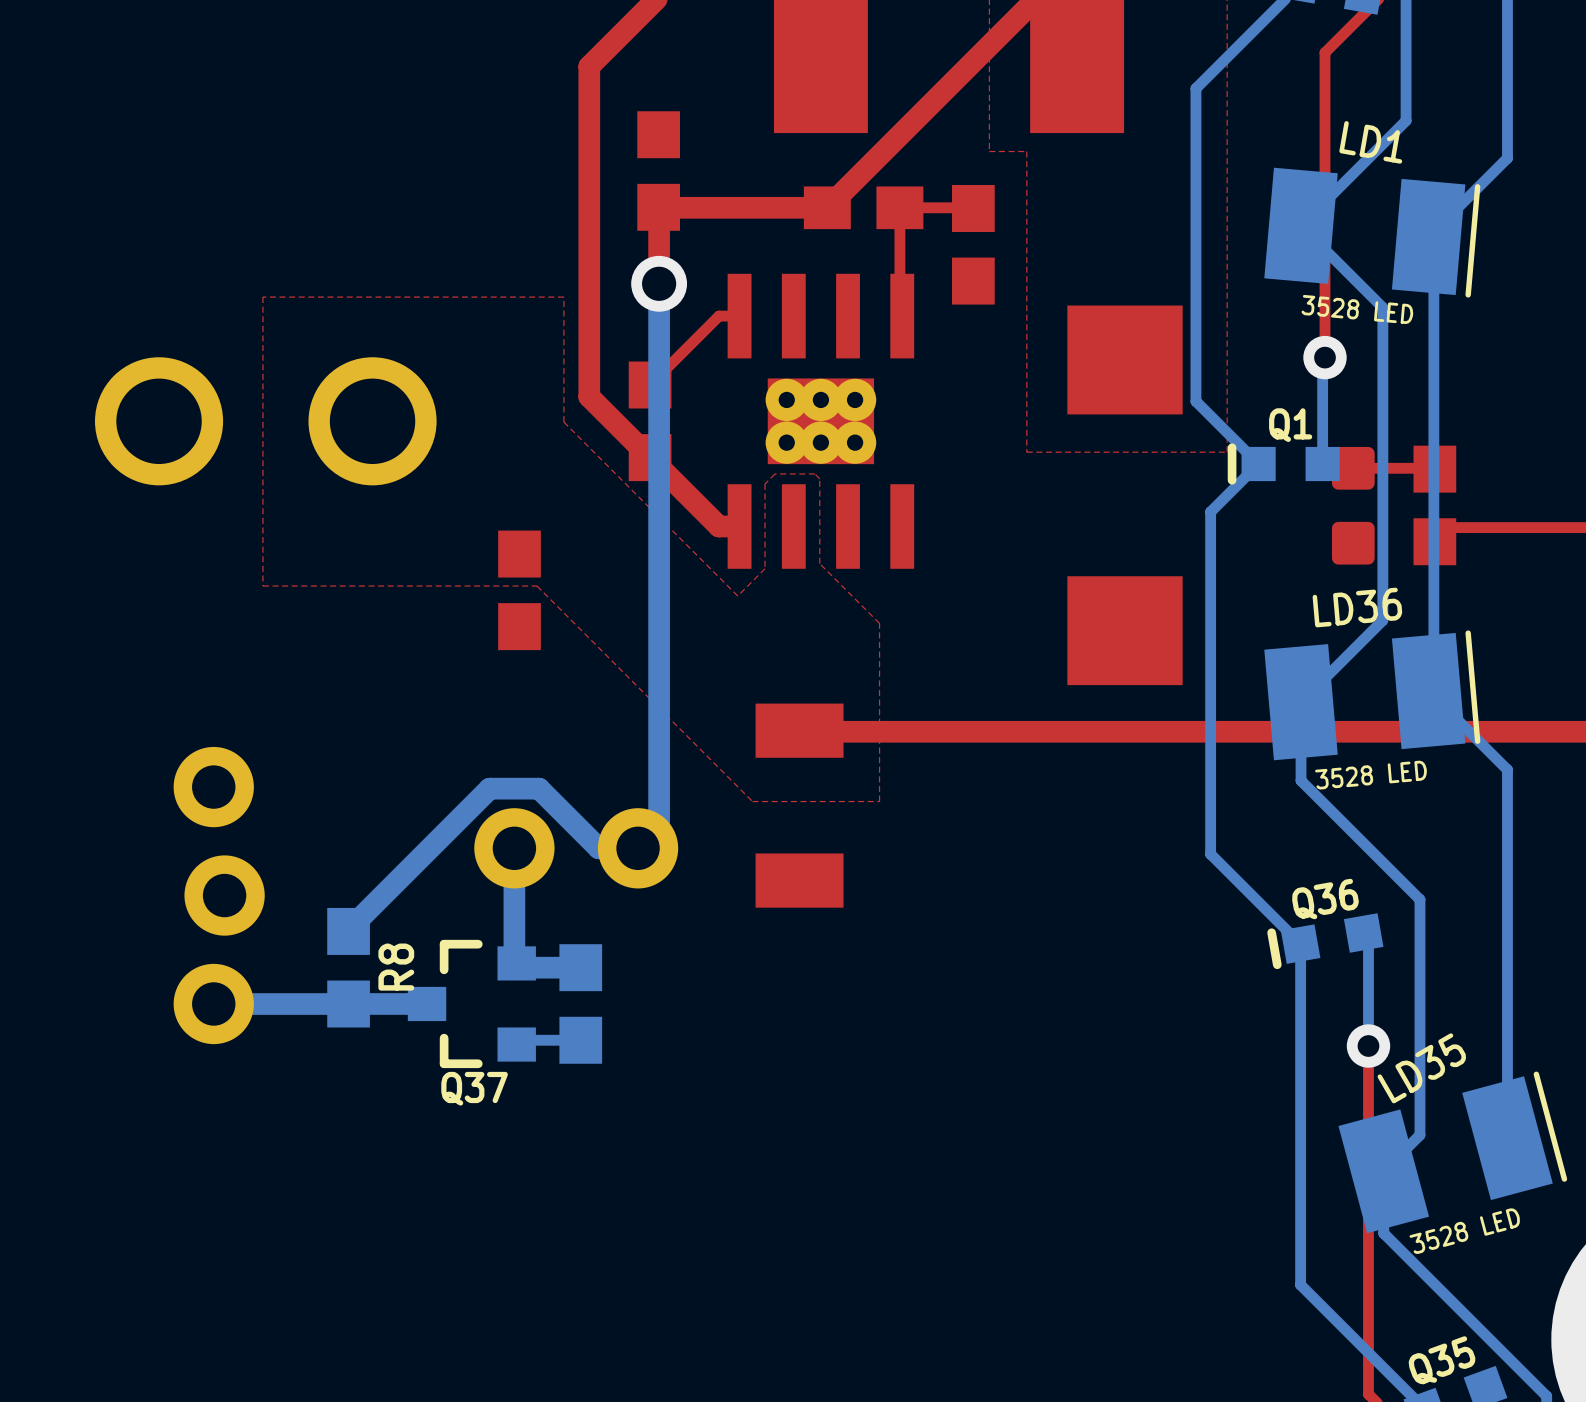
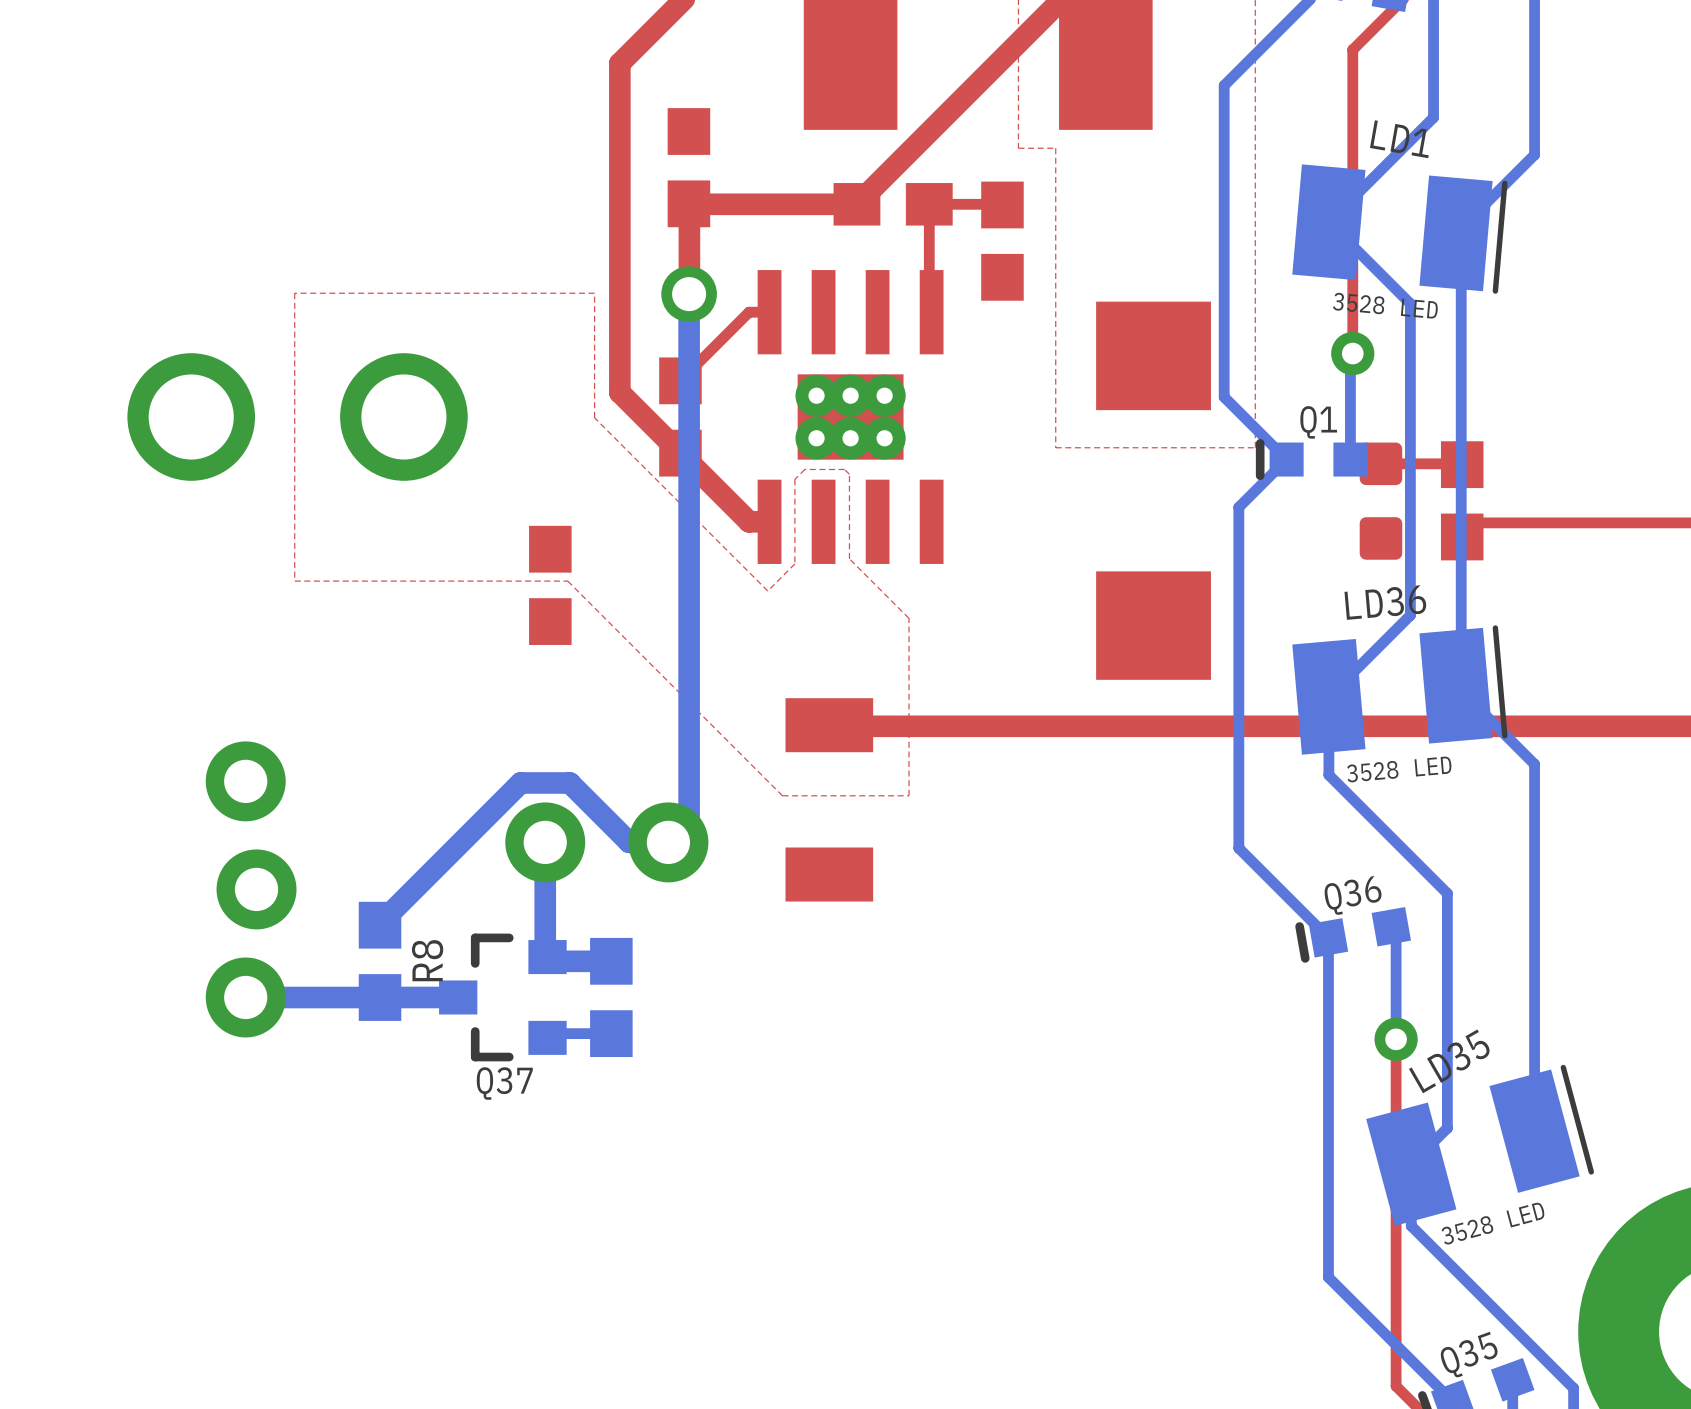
bottom track: (659, 283) (659, 827) -> (689, 294) (689, 821)
via position: (659, 283) -> (689, 294)

